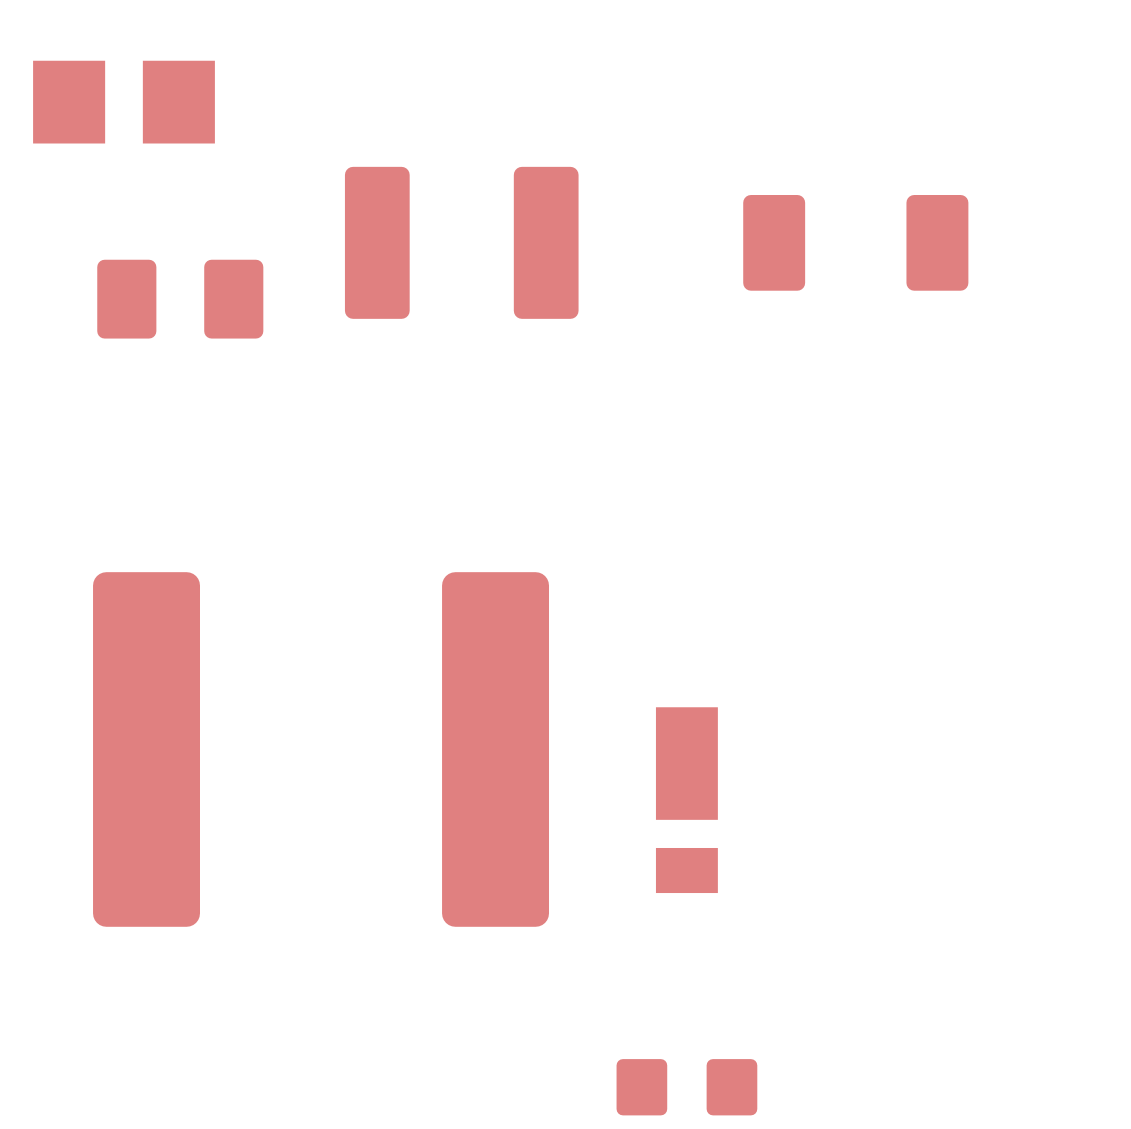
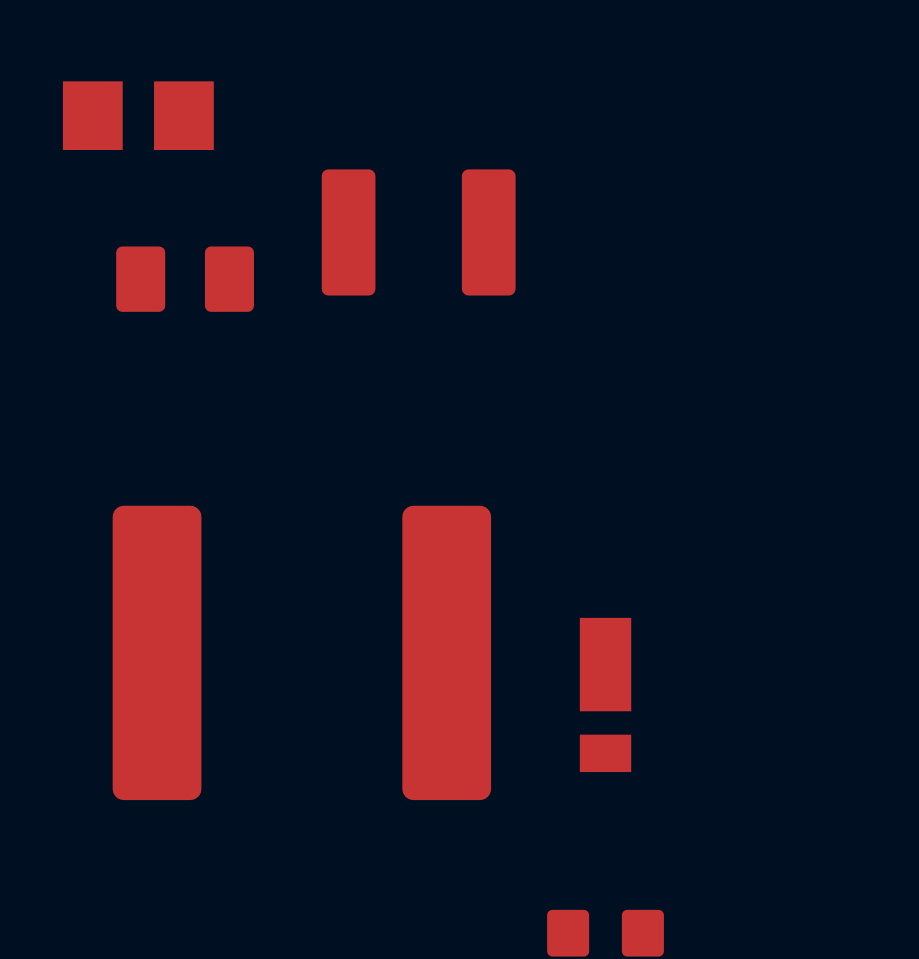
part: (855, 242) -> none

